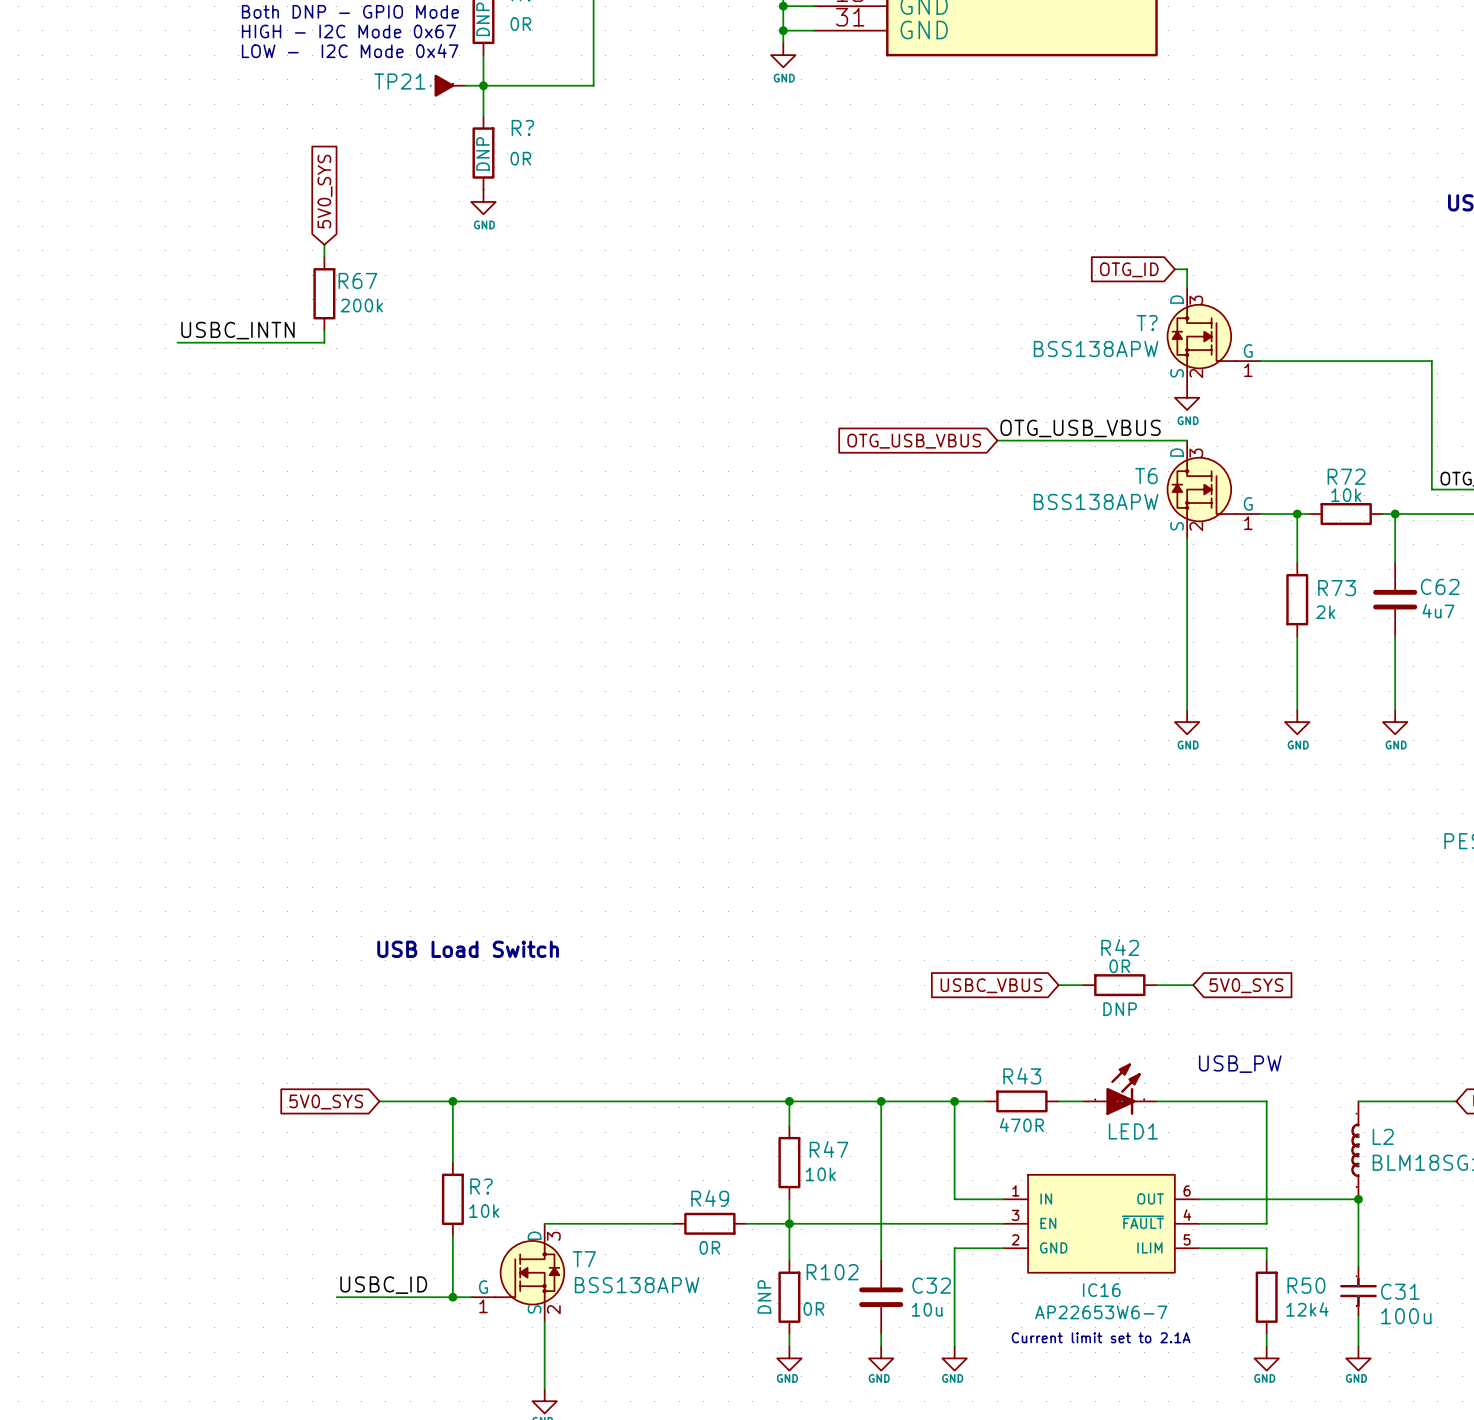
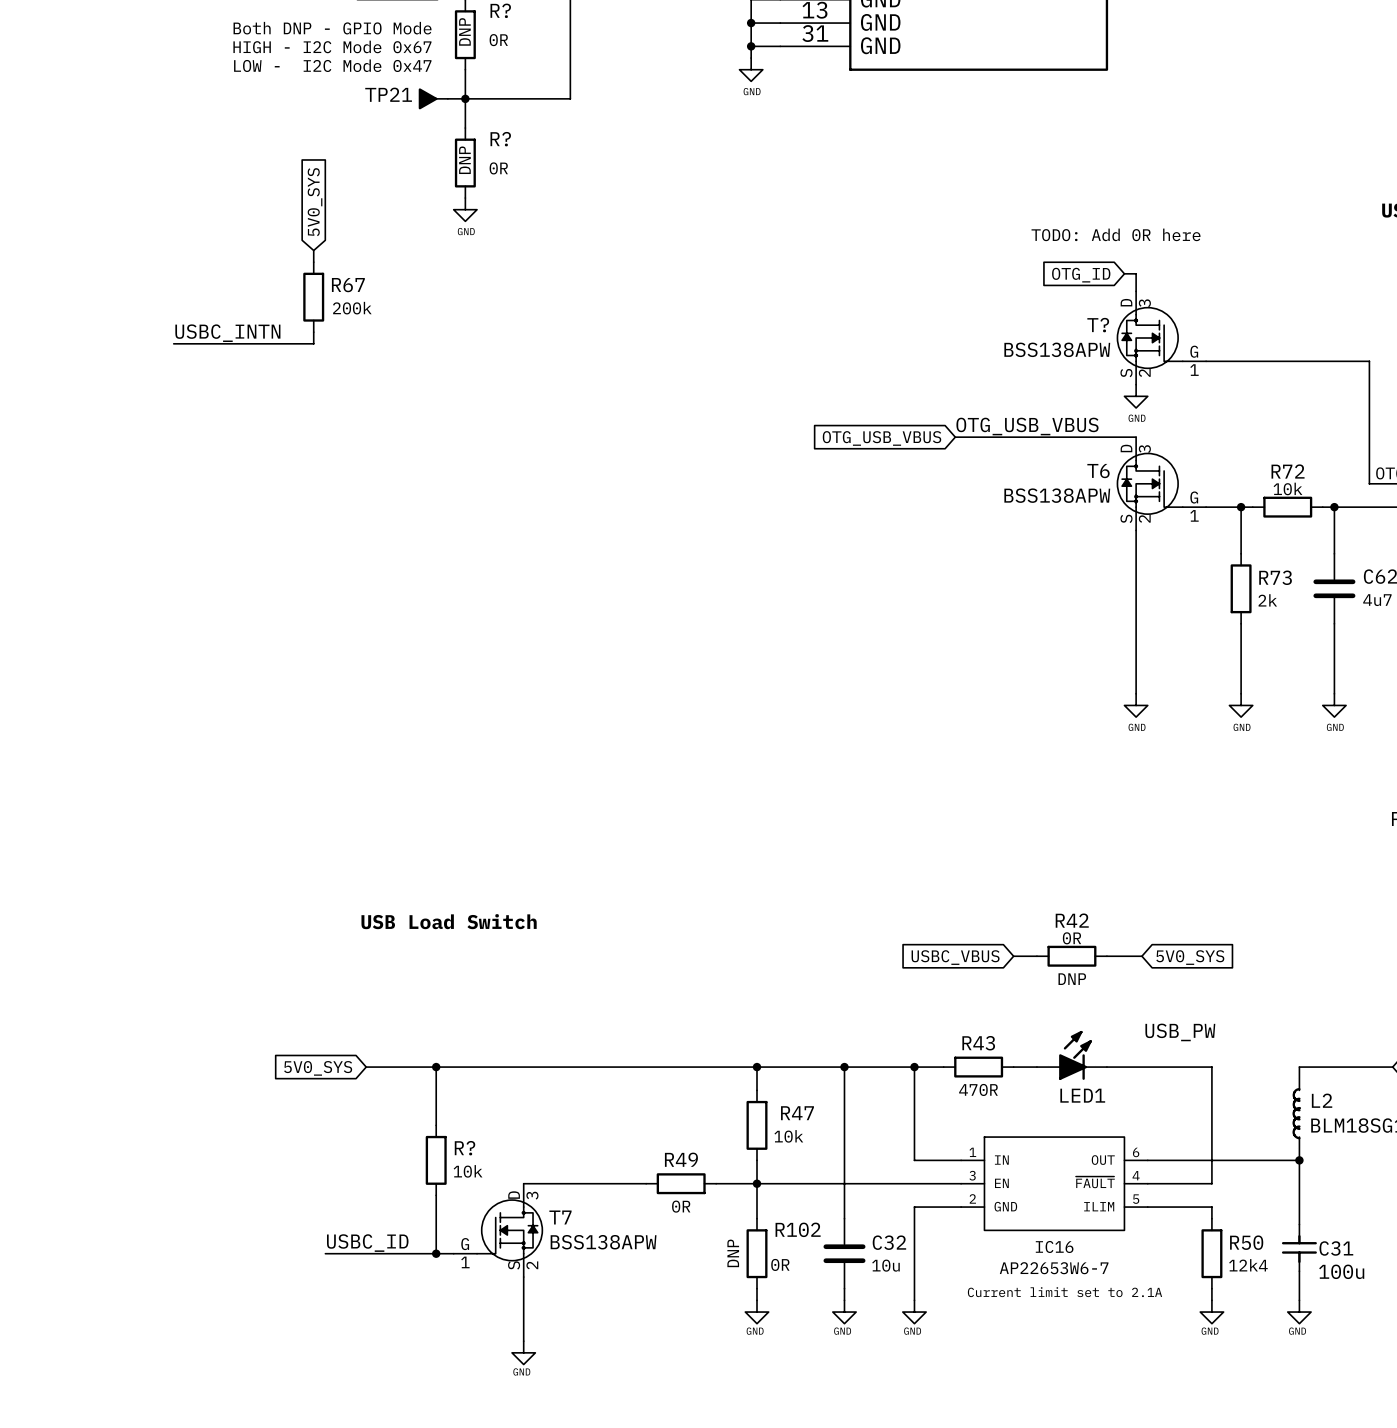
text: none -> TODO: Add 0R here (1116, 234)

